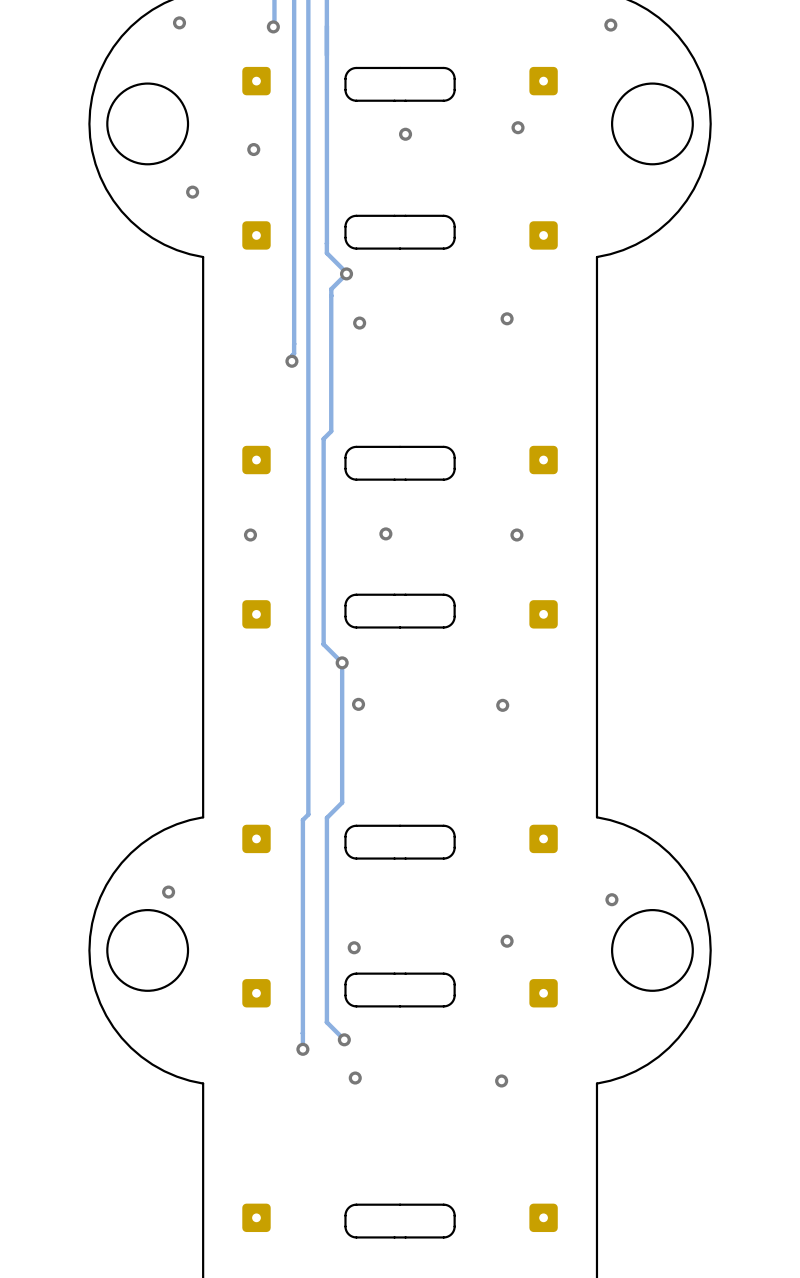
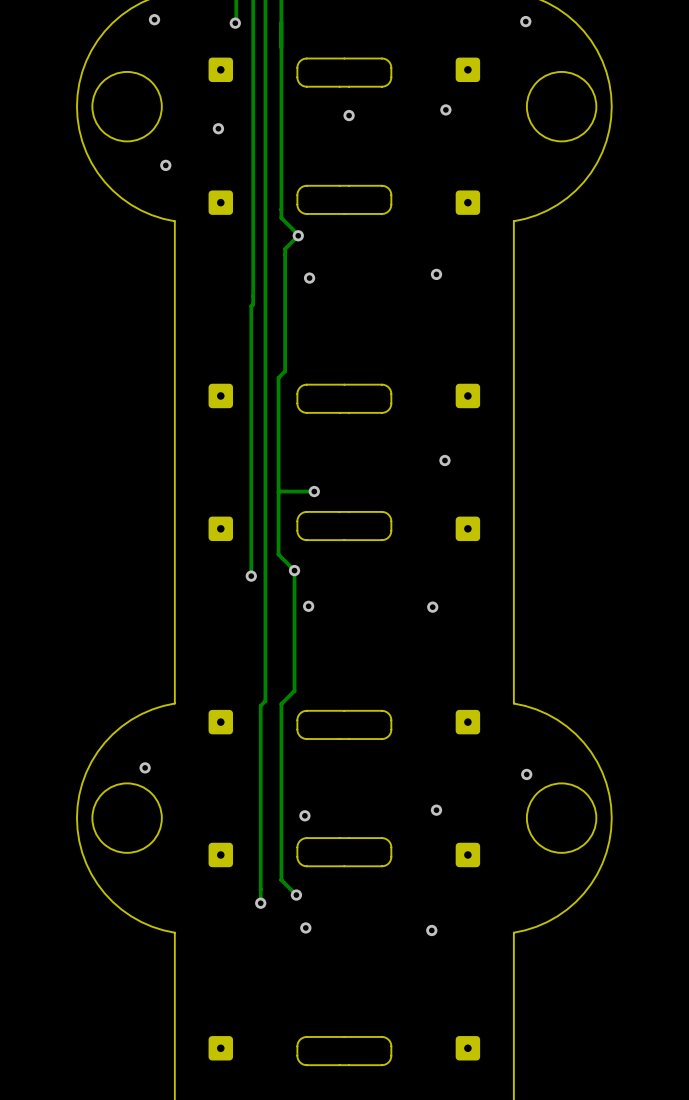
track: none -> (251, 310) (251, 576)
via: (291, 361) -> none
via position: (385, 533) -> (314, 491)
via: (250, 535) -> none
track: none -> (314, 491) (278, 492)
via: none -> (251, 576)

